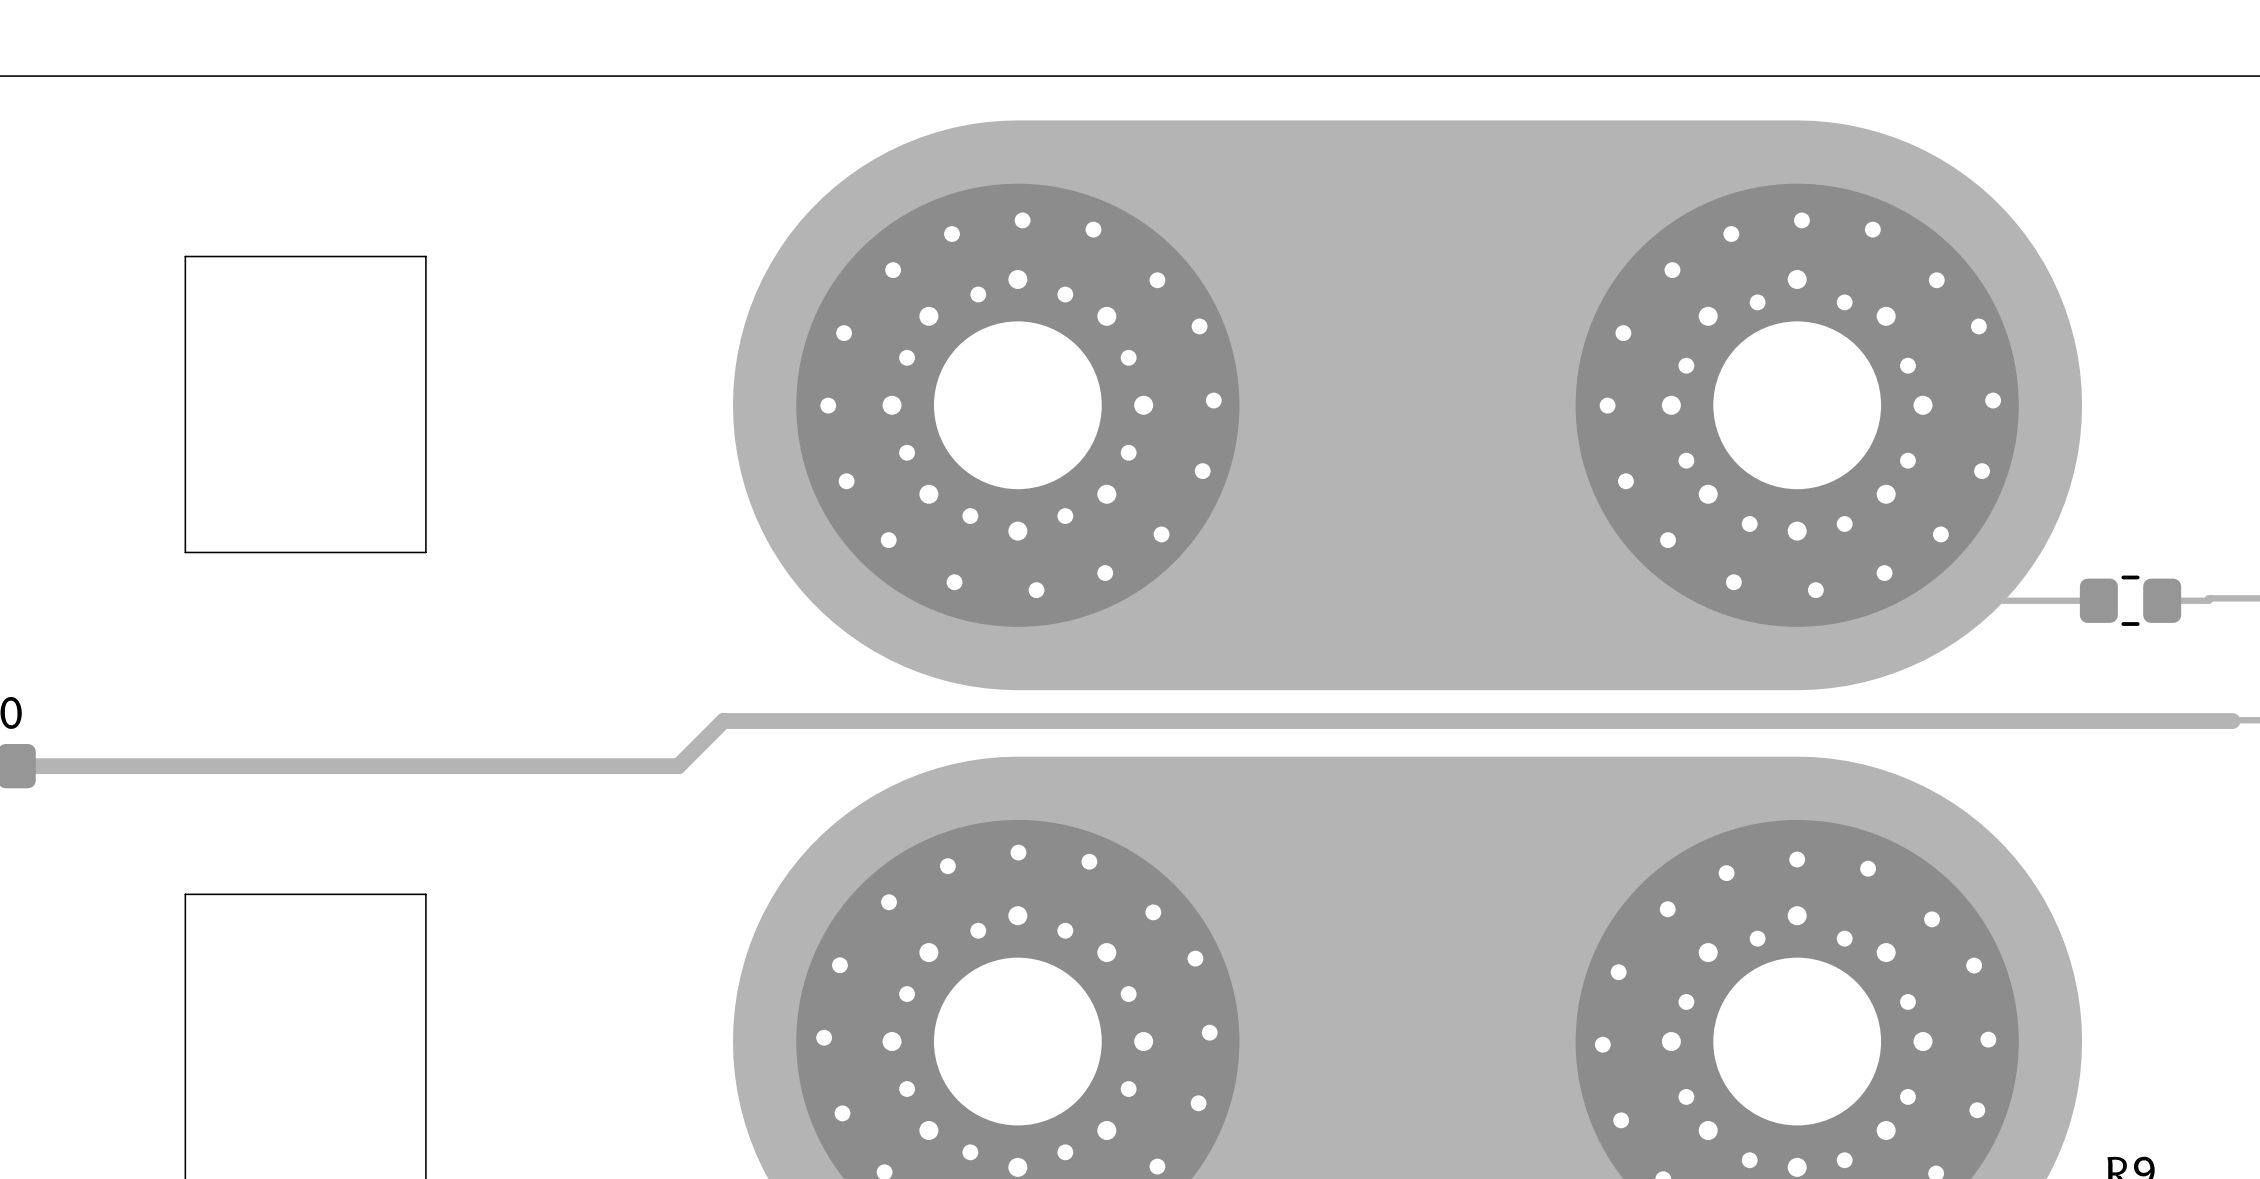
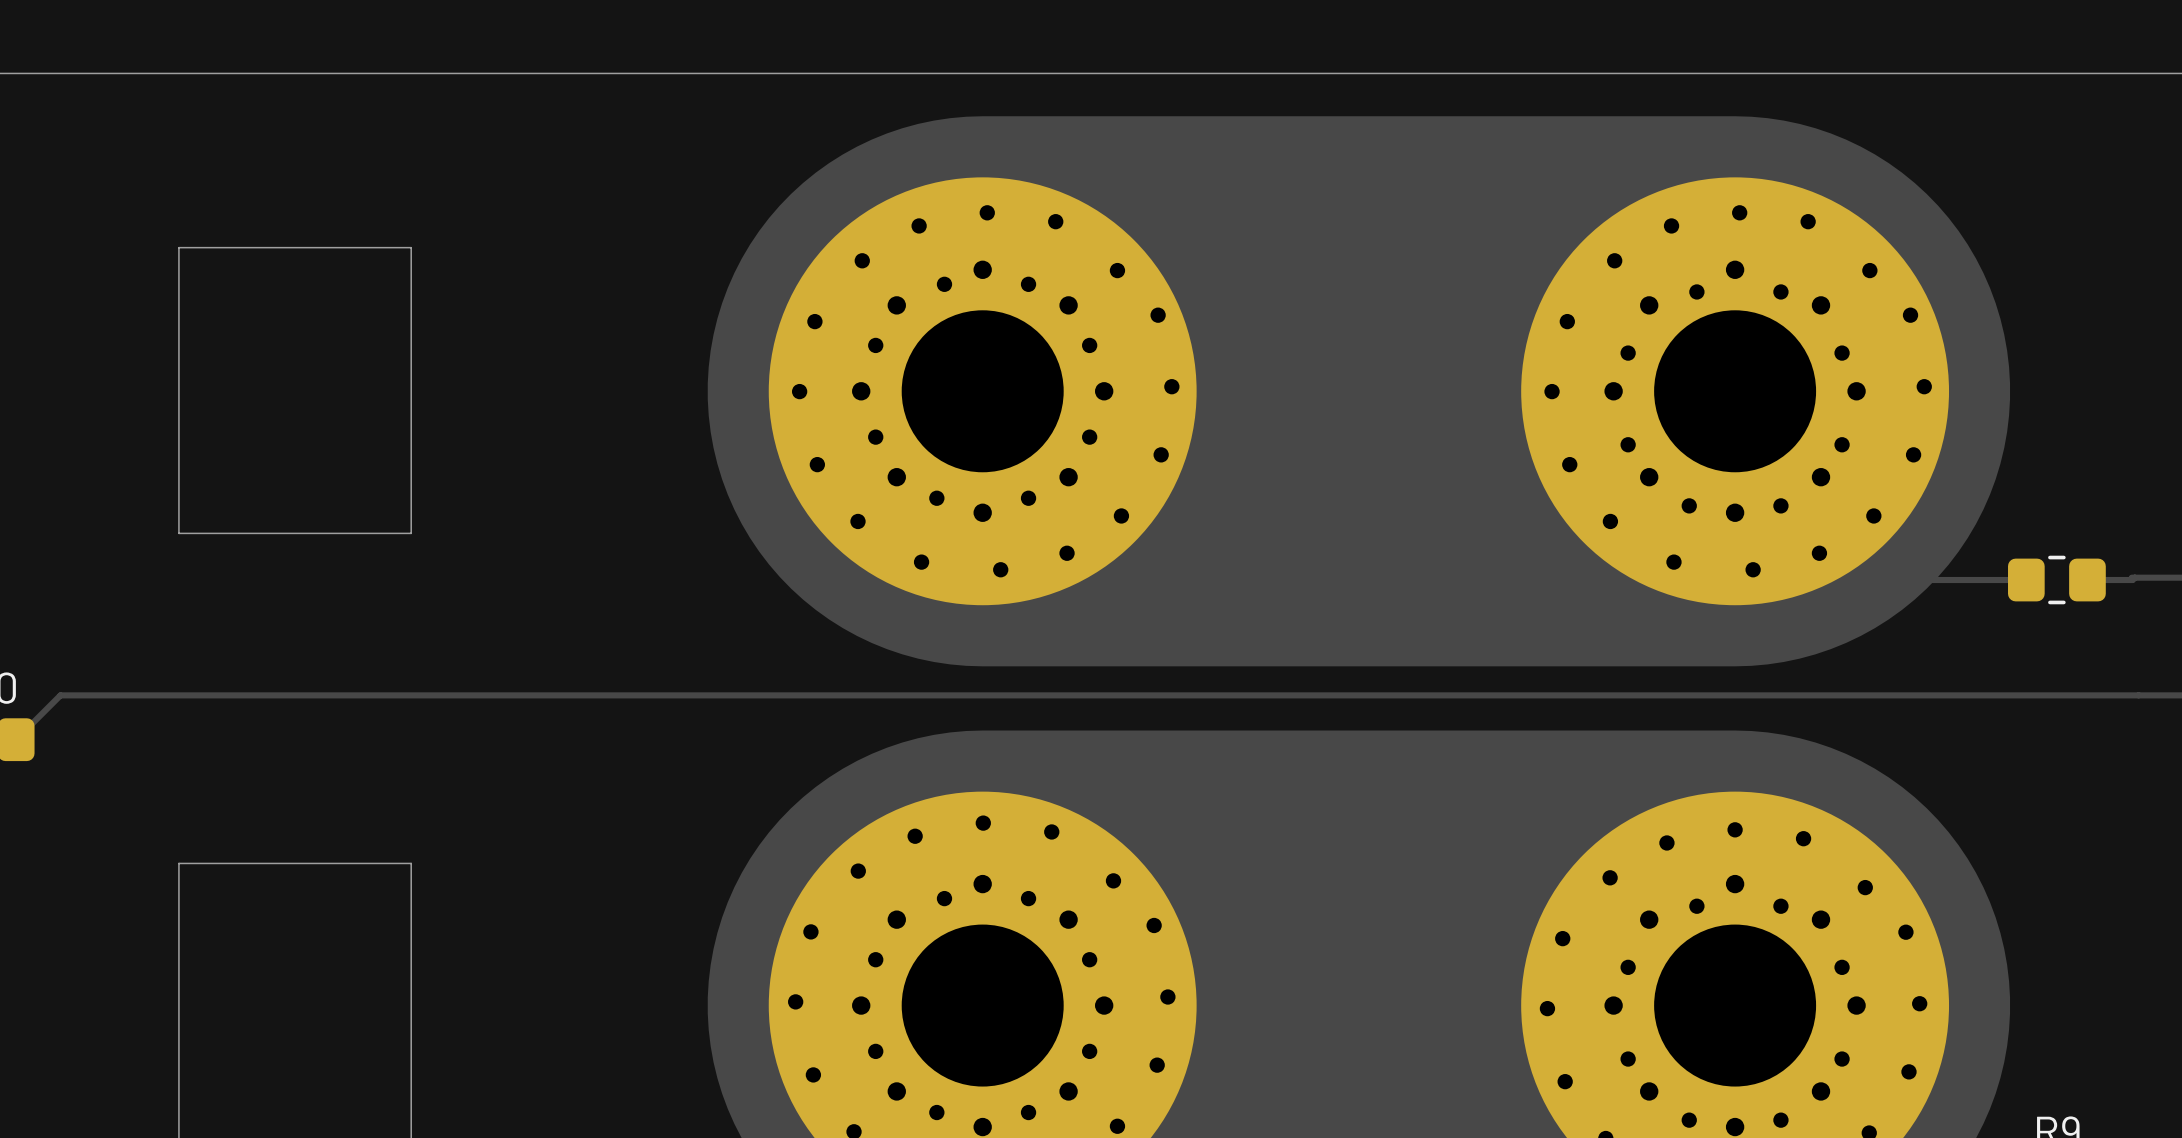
track: (2232, 721) (723, 721) (678, 766) (16, 766) -> (2138, 695) (60, 695) (16, 739)

